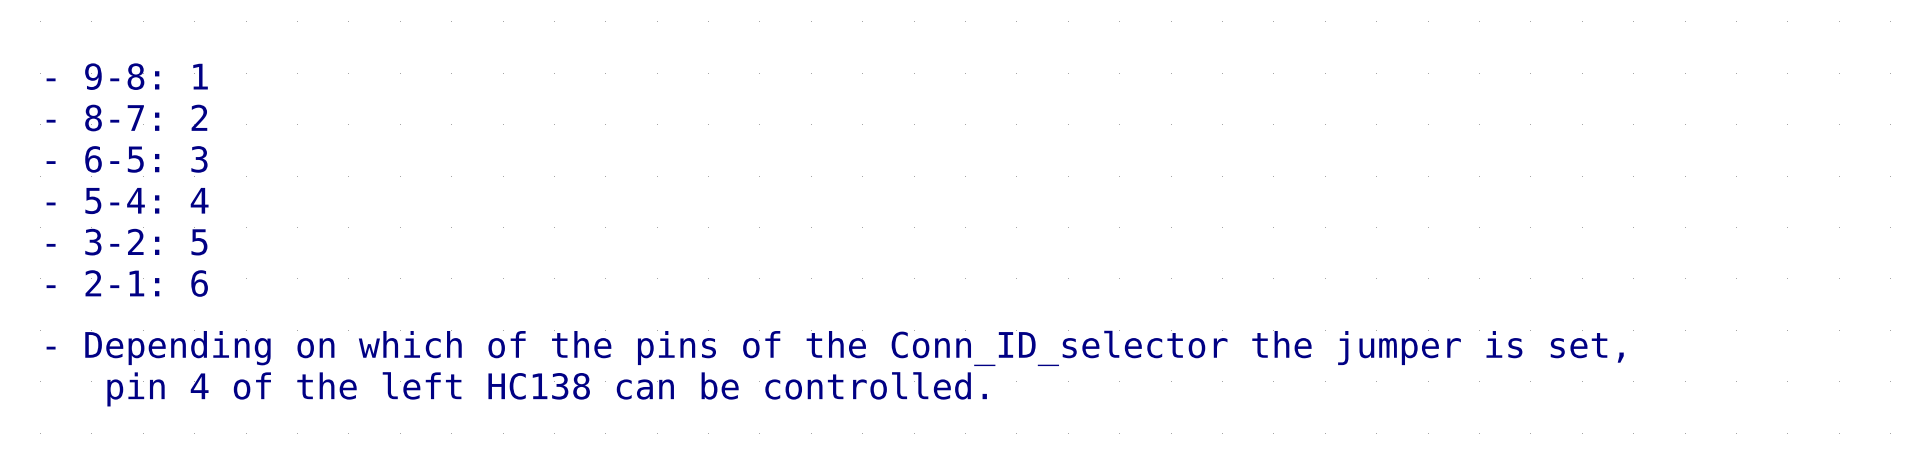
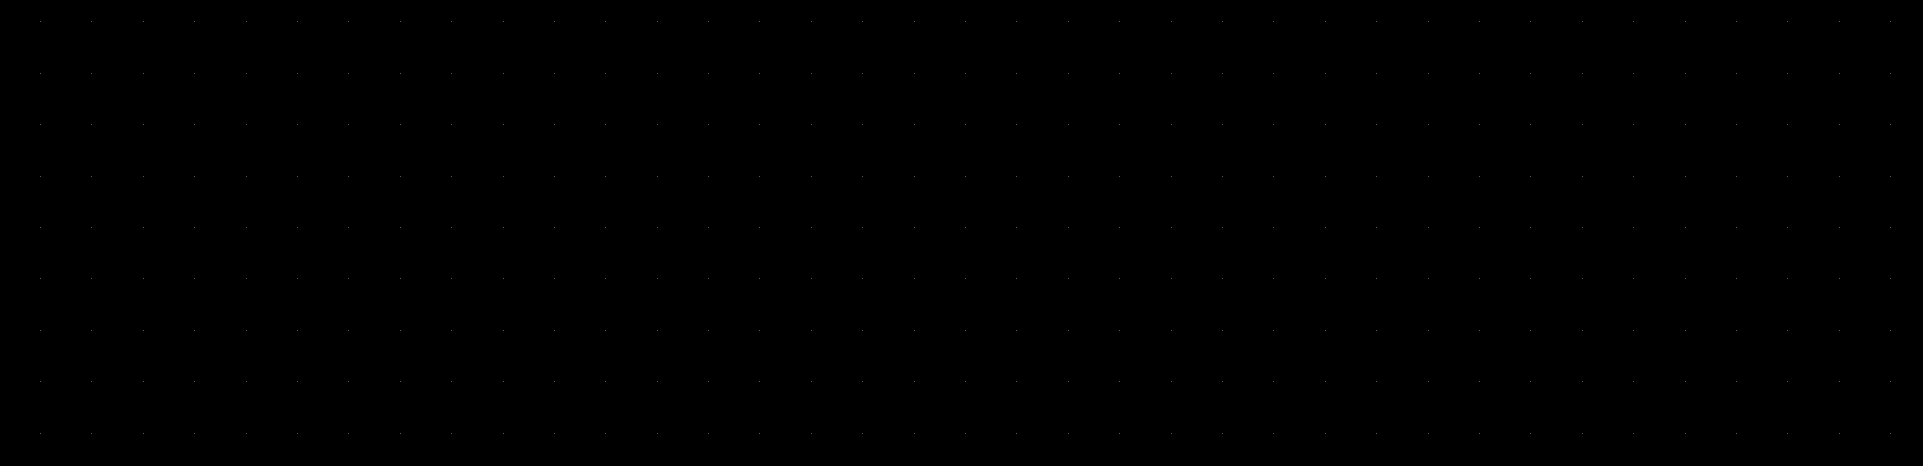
text: - 9-8: 1 (127, 76) -> none
text: - 8-7: 2 (126, 118) -> none
text: - 6-5: 3 (127, 159) -> none
text: - 5-4: 4 (127, 201) -> none
text: - 3-2: 5 (127, 242) -> none
text: - 2-1: 6 (127, 283) -> none
text: - Depending on which of the pins of the Conn_ID_selector the jumper is set, (835, 348) -> none
text: pin 4 of the left HC138 can be controlled. (547, 389) -> none

